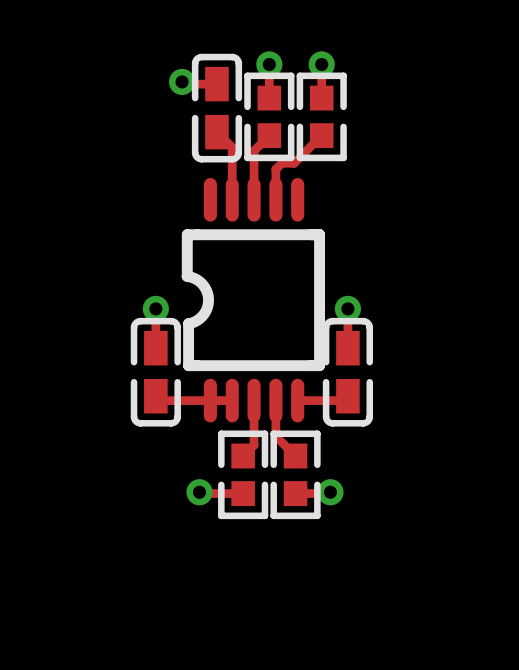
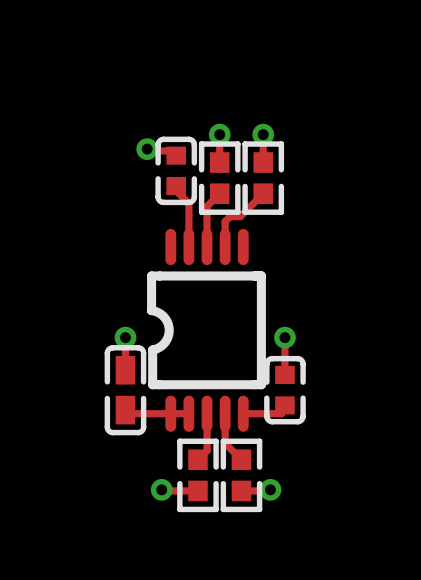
part footprint: [191, 53, 243, 163] -> [155, 136, 198, 206]
part footprint: [322, 317, 374, 427] -> [264, 355, 306, 425]

